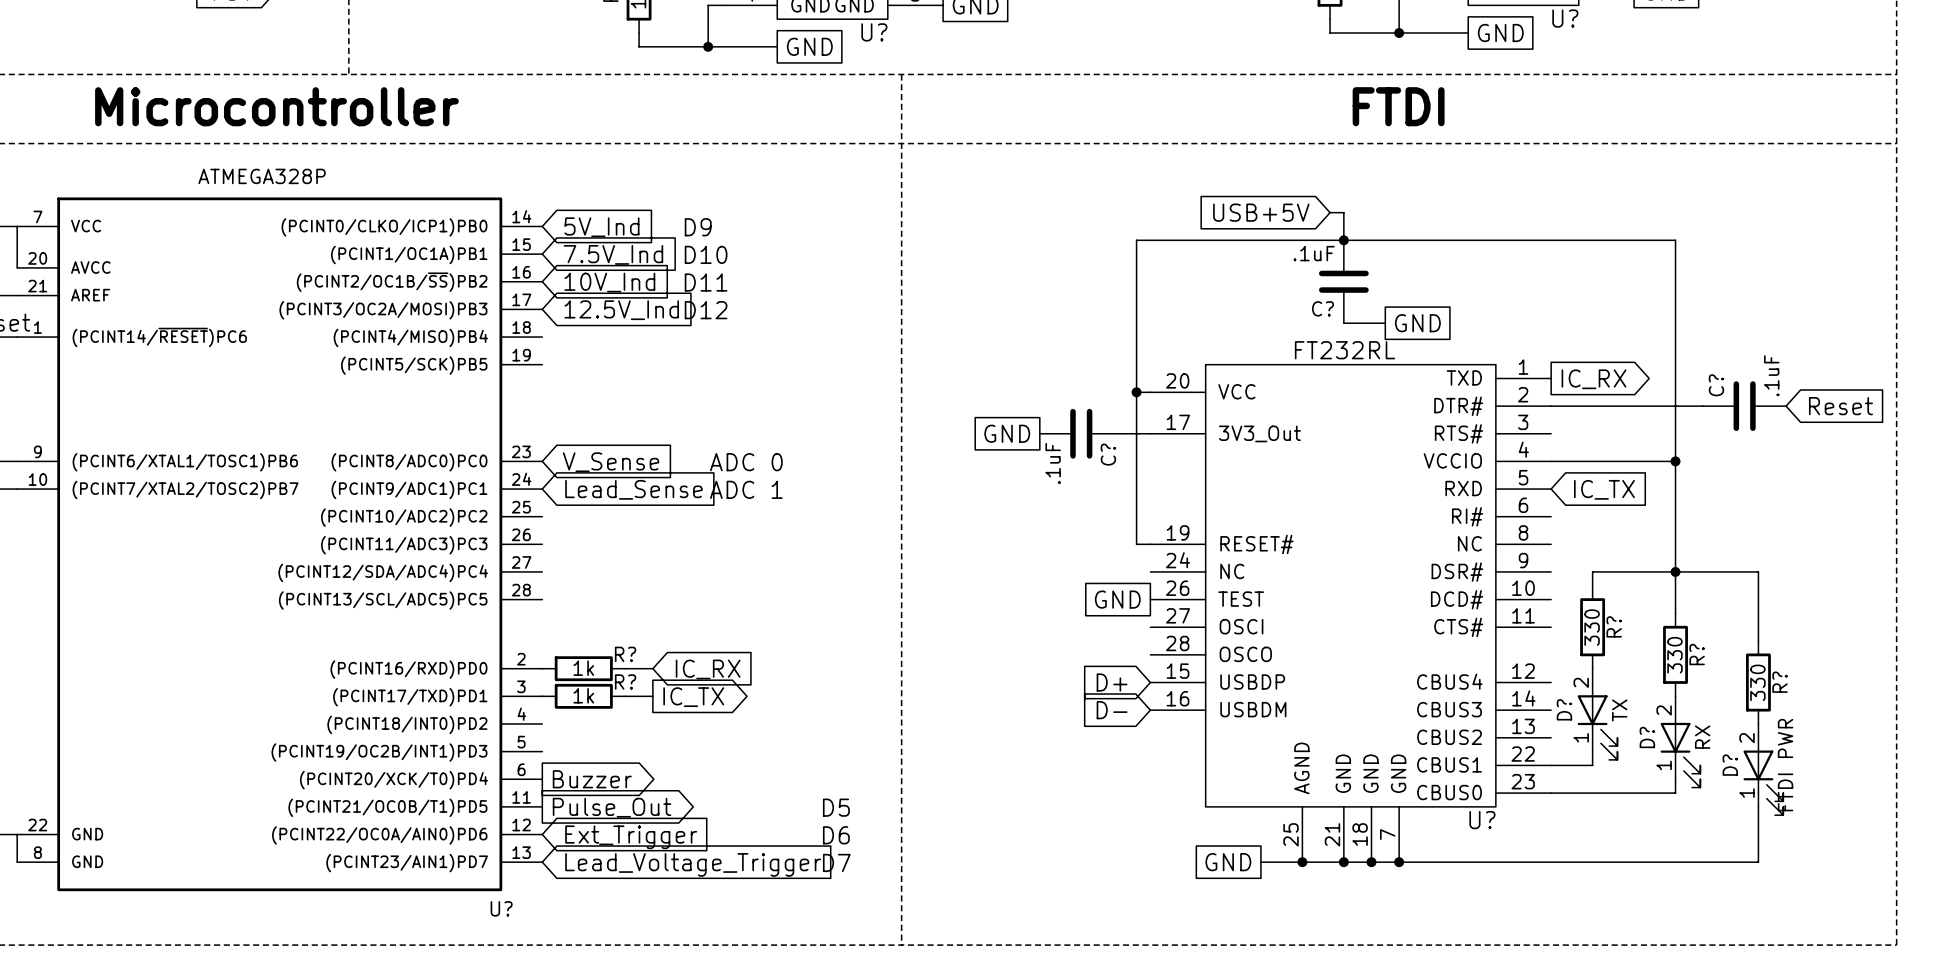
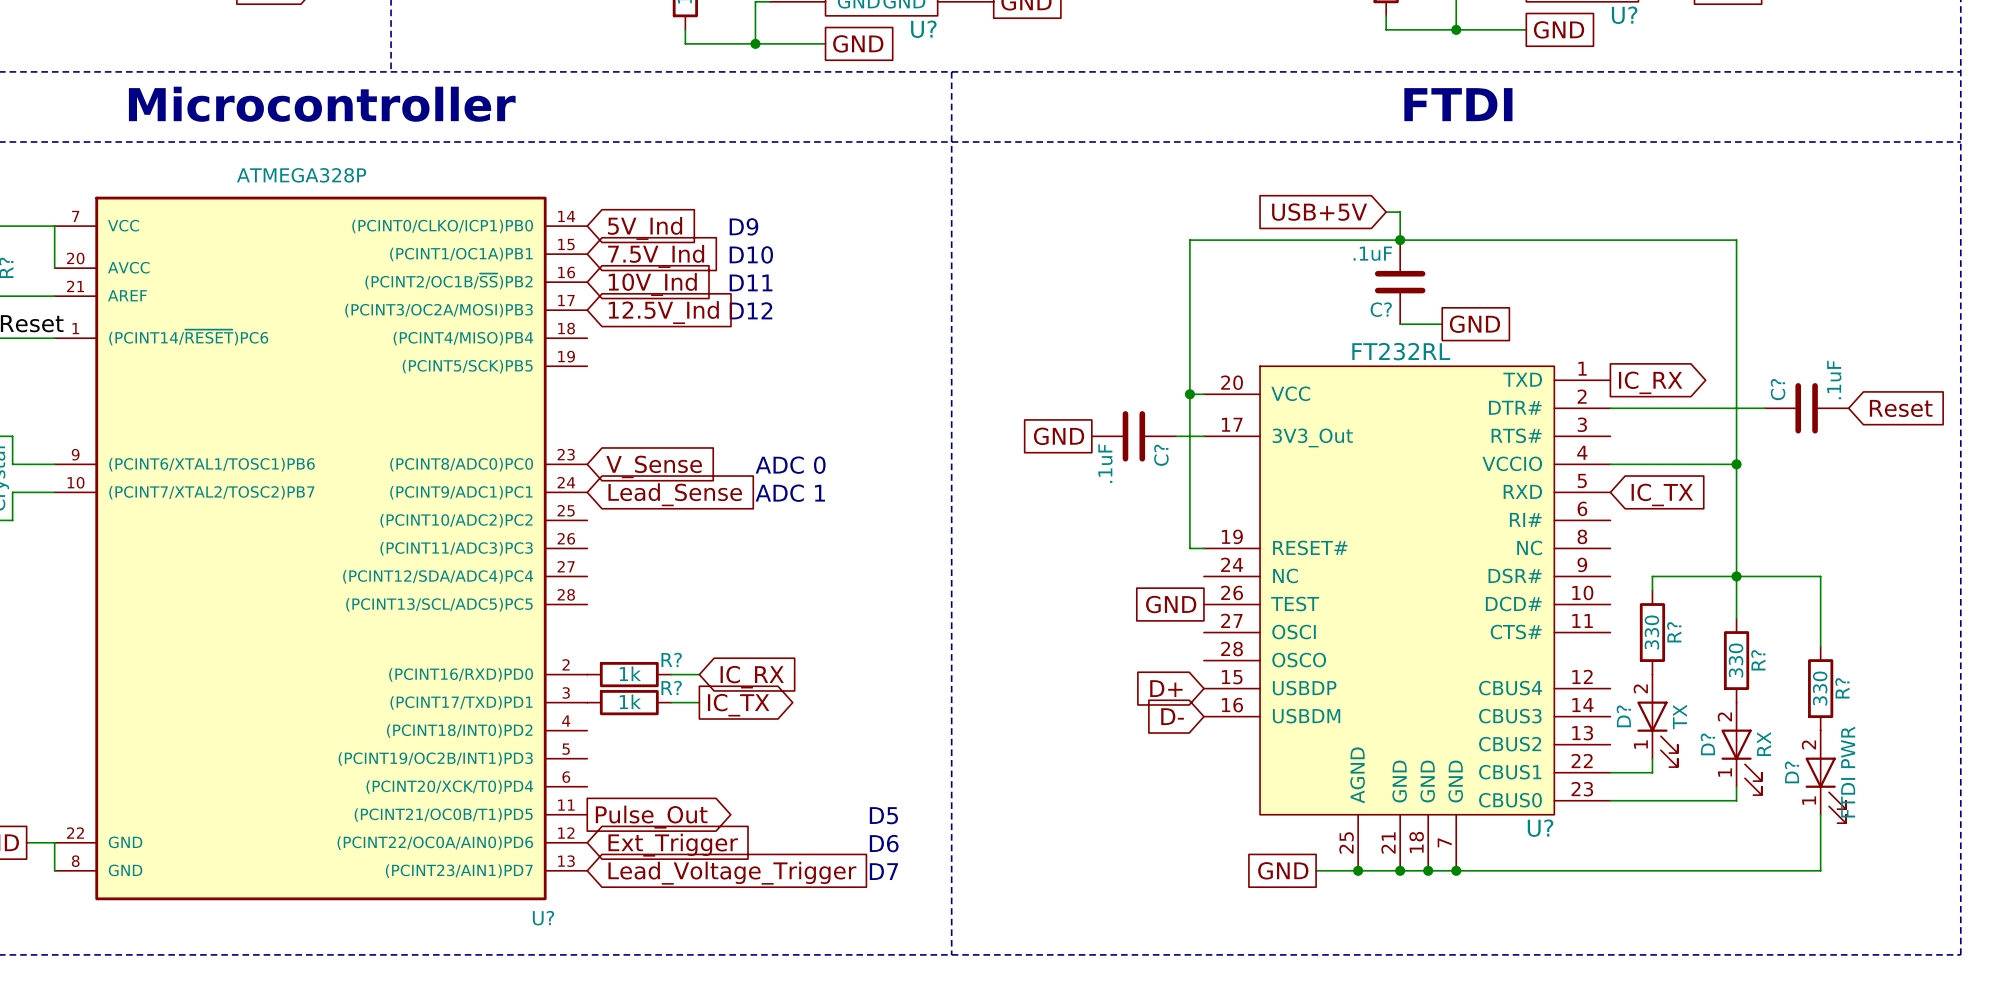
global label: Buzzer (592, 779) -> none

